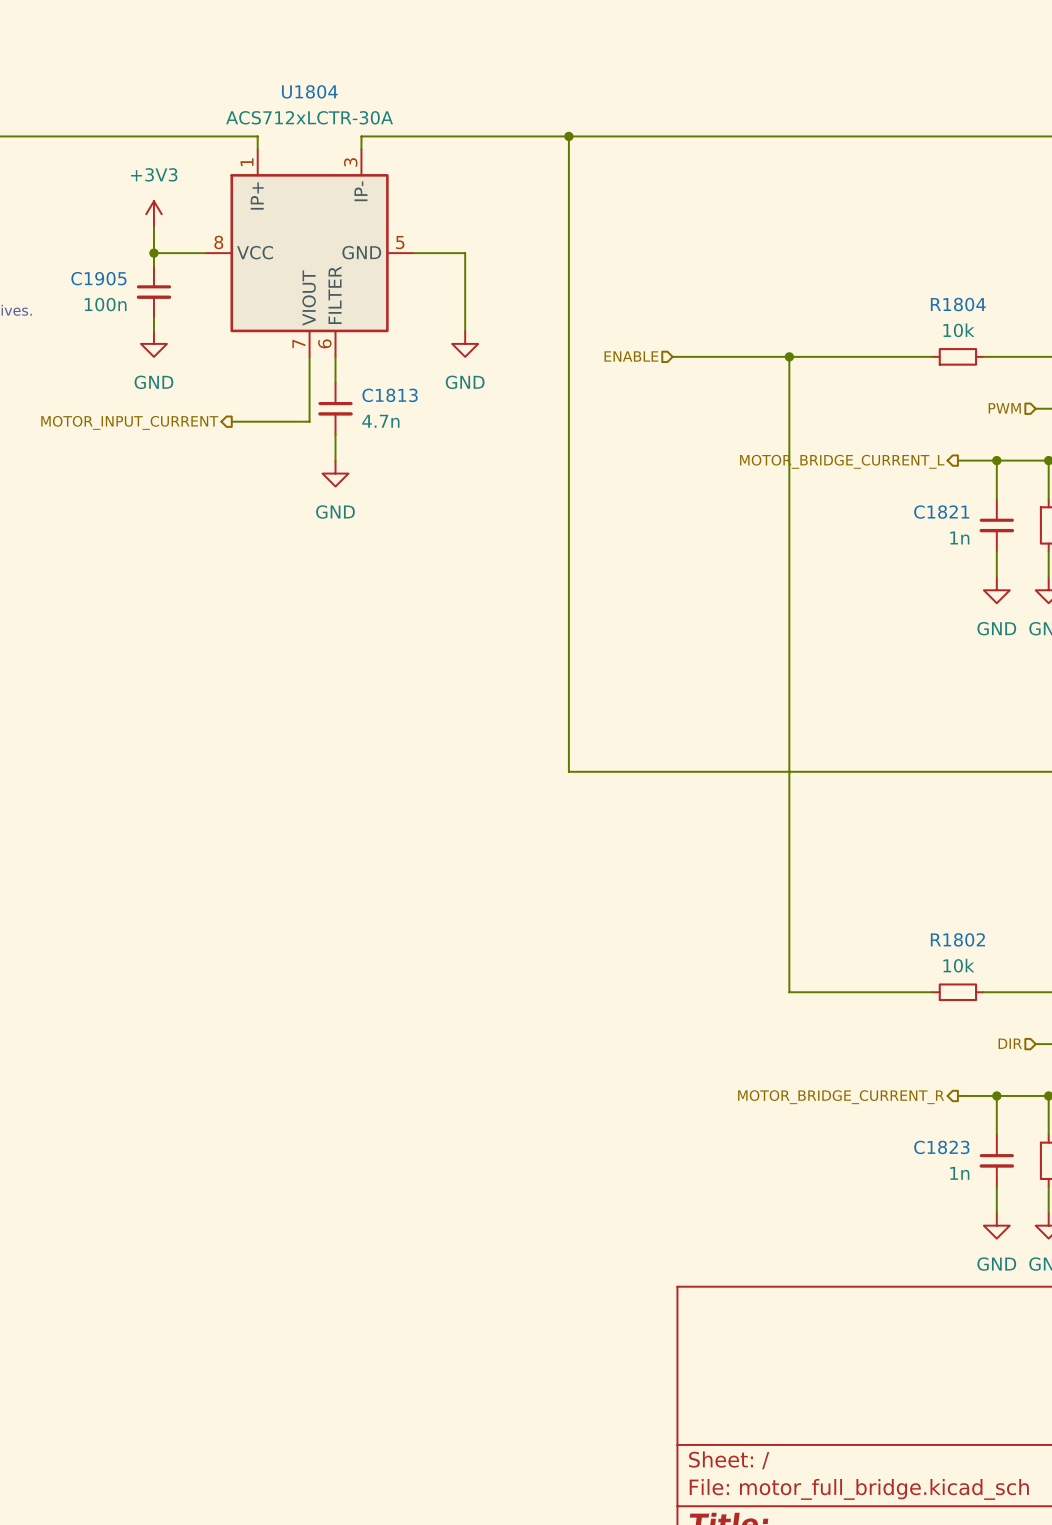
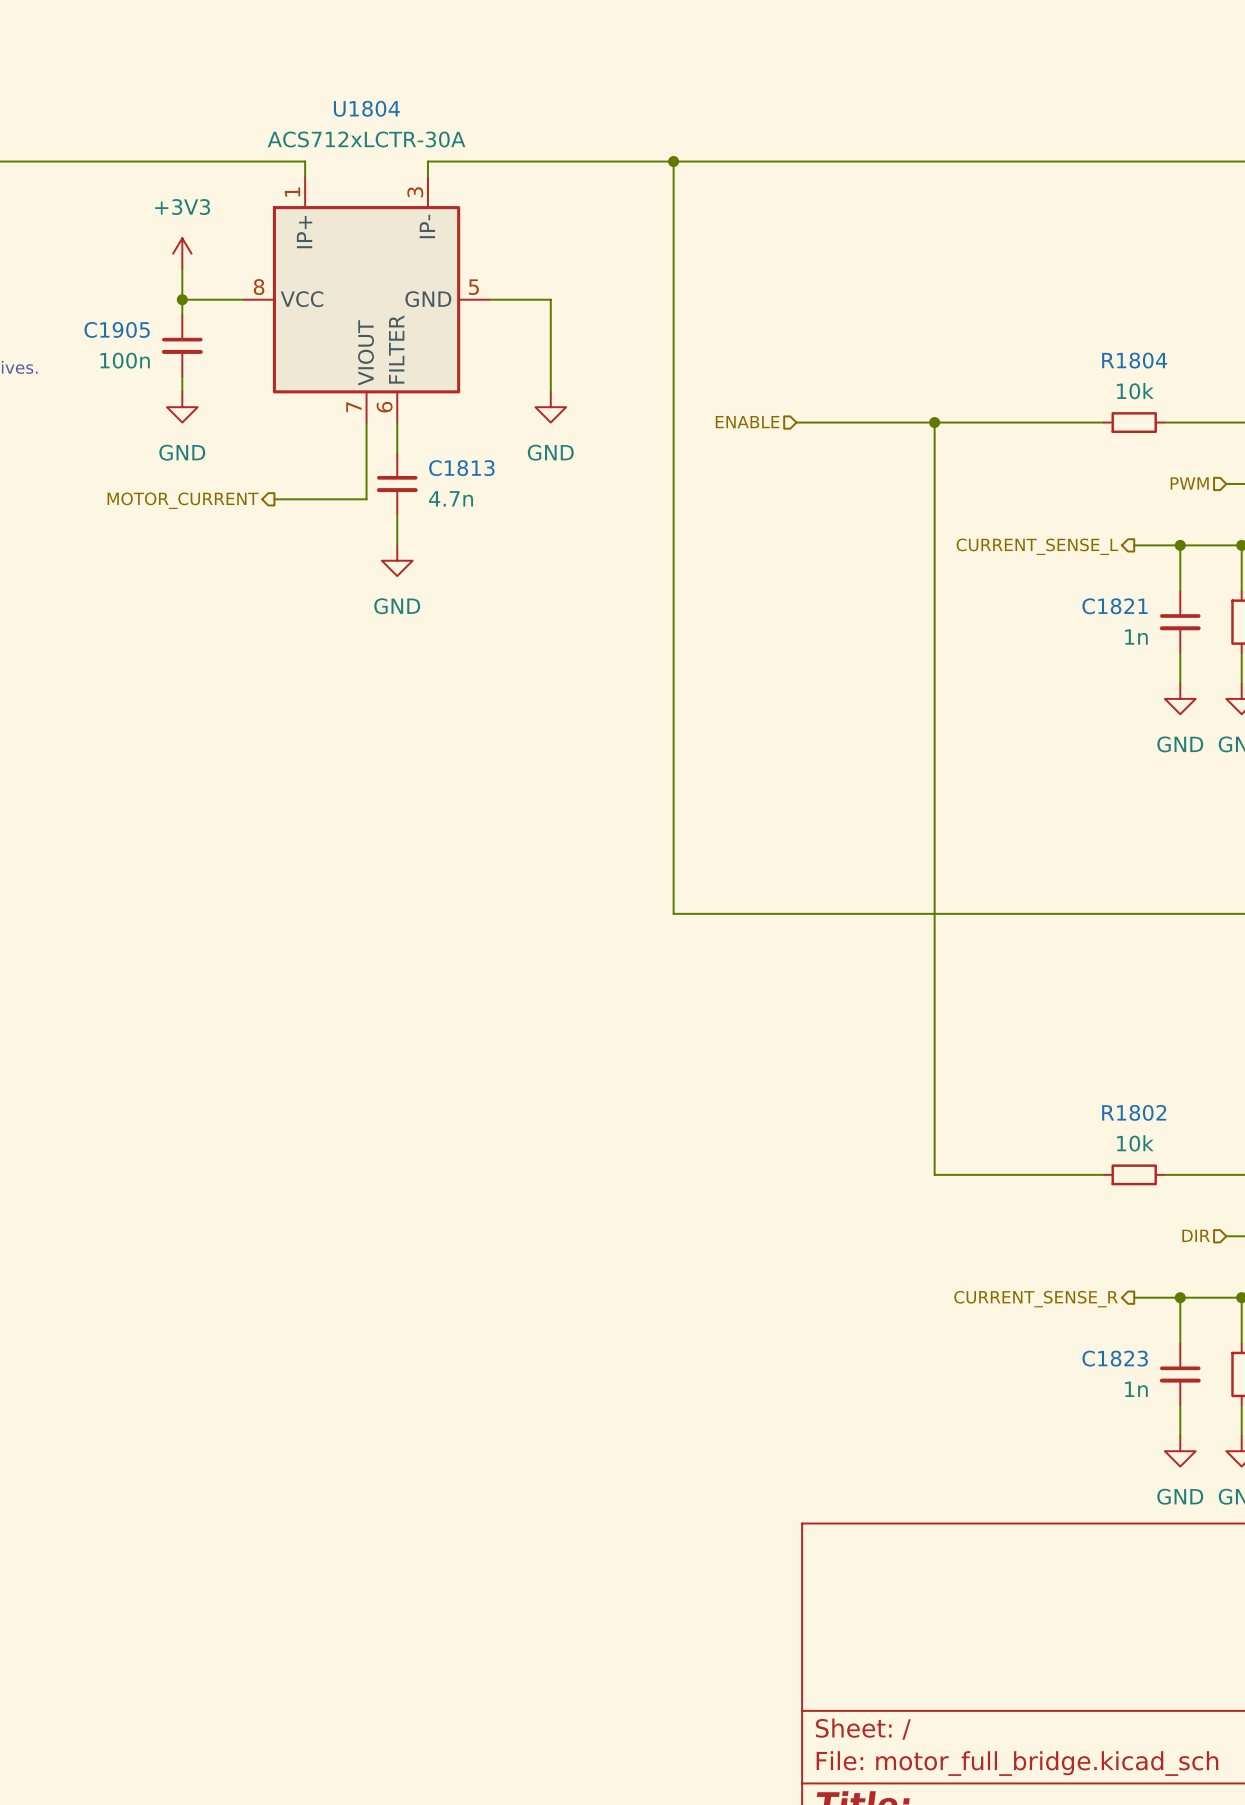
hierarchical label: MOTOR_INPUT_CURRENT (129, 422) -> MOTOR_CURRENT (183, 500)
hierarchical label: MOTOR_BRIDGE_CURRENT_L (842, 461) -> CURRENT_SENSE_L (1037, 546)
hierarchical label: MOTOR_BRIDGE_CURRENT_R (841, 1097) -> CURRENT_SENSE_R (1036, 1299)

